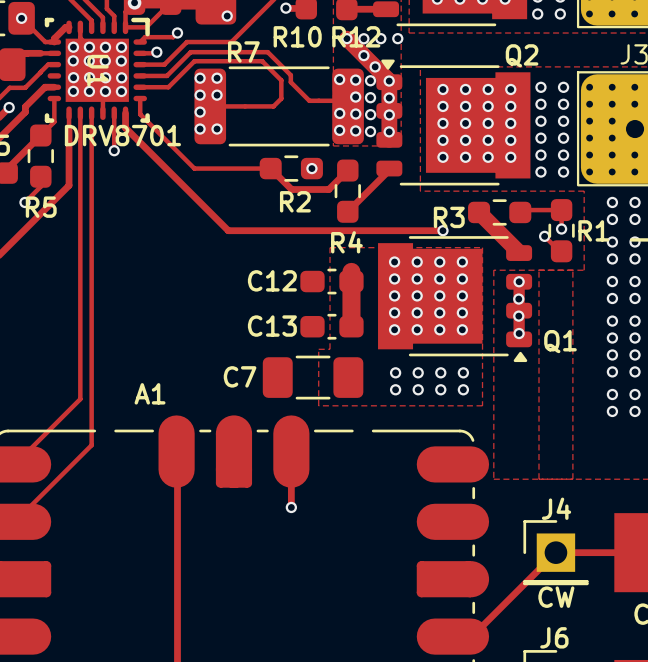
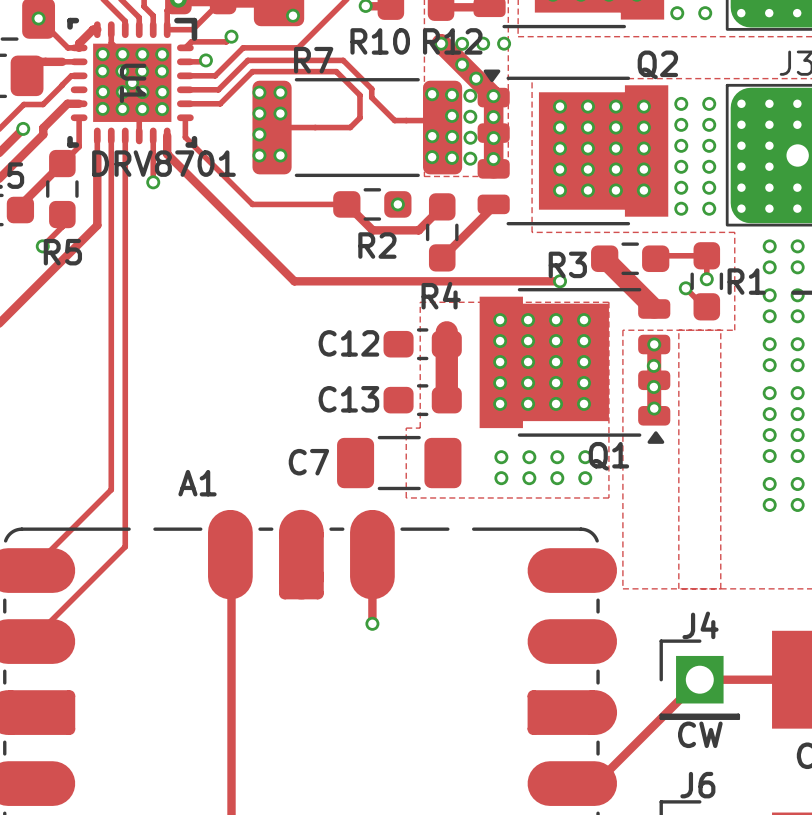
via: none -> (132, 82)
Q1 name position: Q1 (560, 341) -> Q1 (608, 456)

